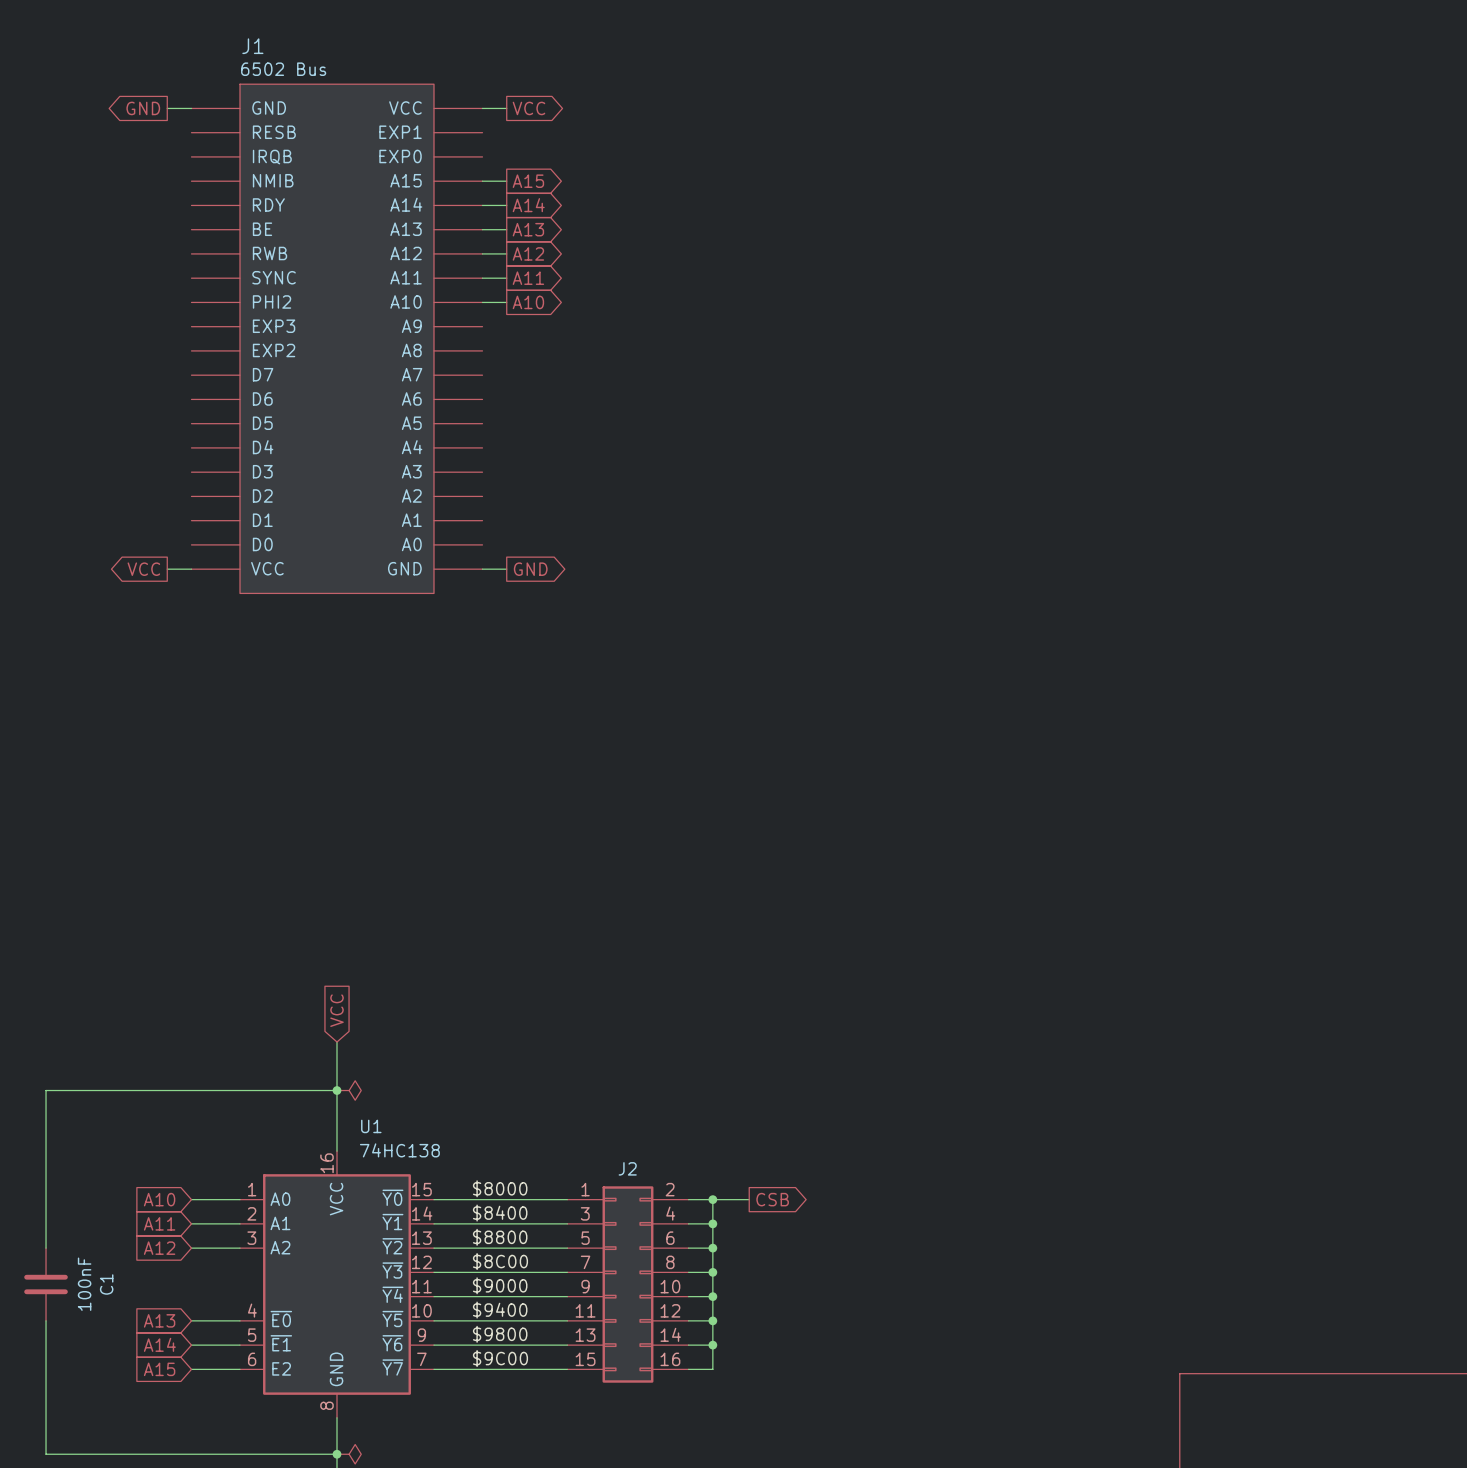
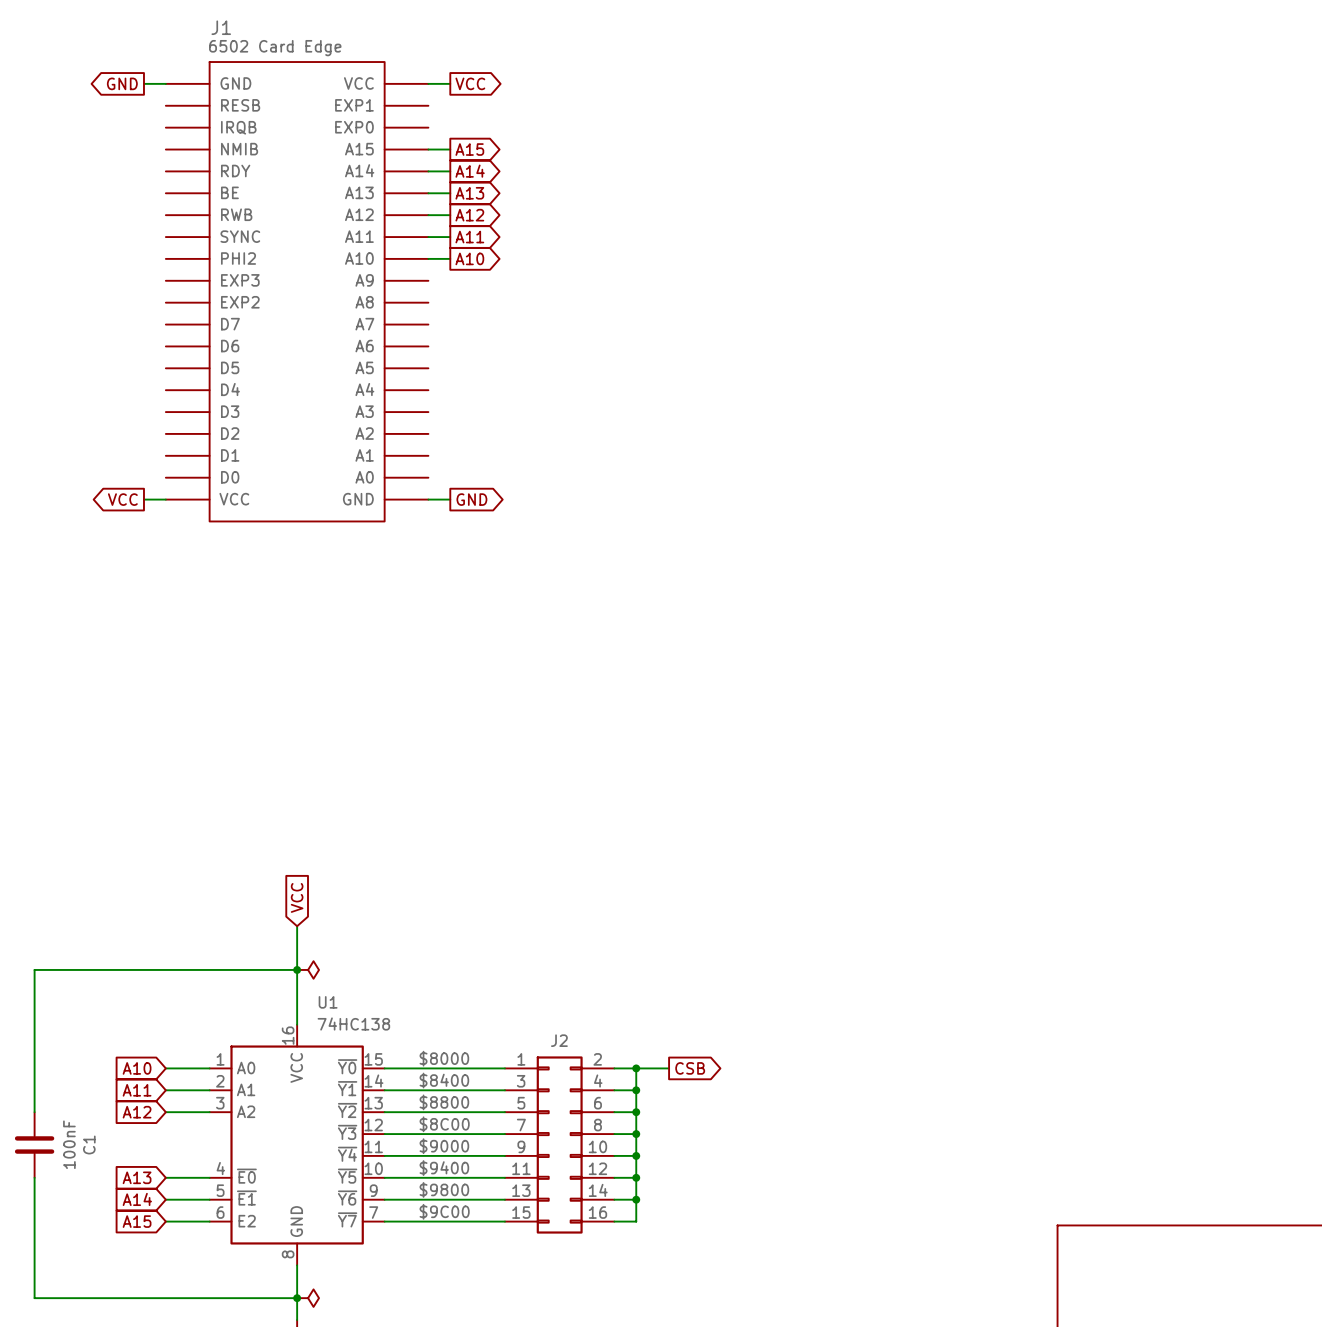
J1 value: 6502 Bus (283, 69) -> 6502 Card Edge (275, 48)

